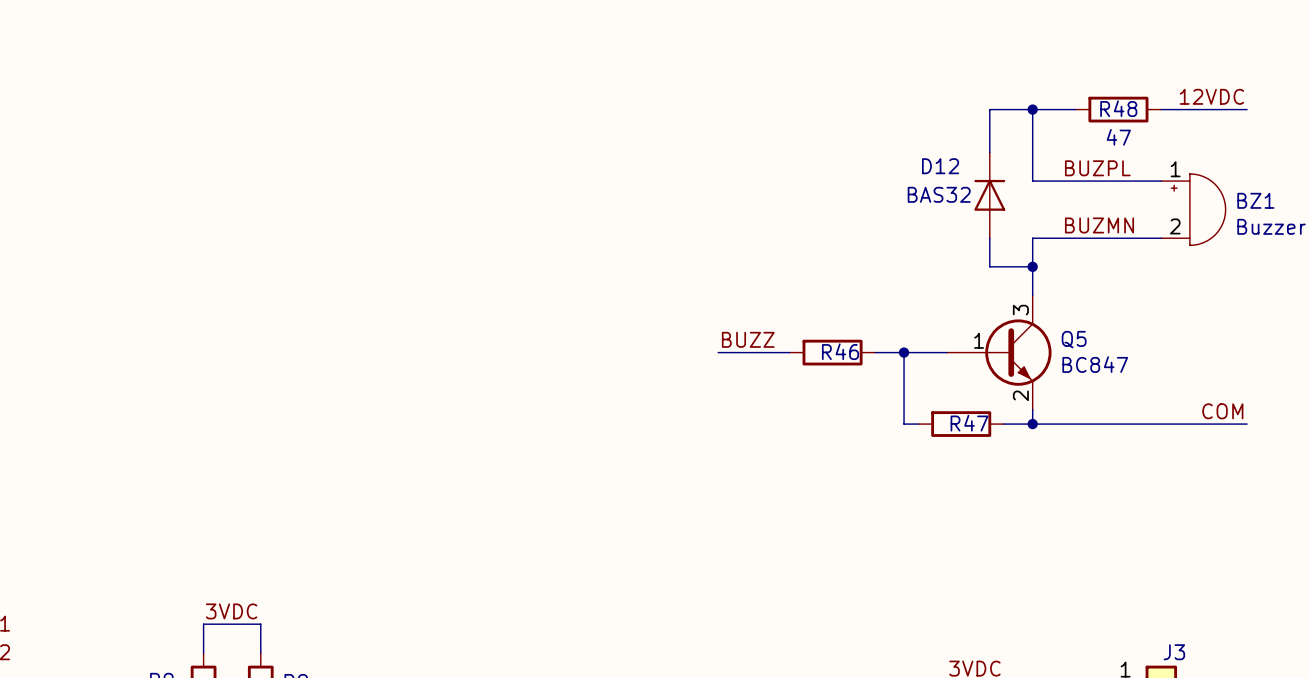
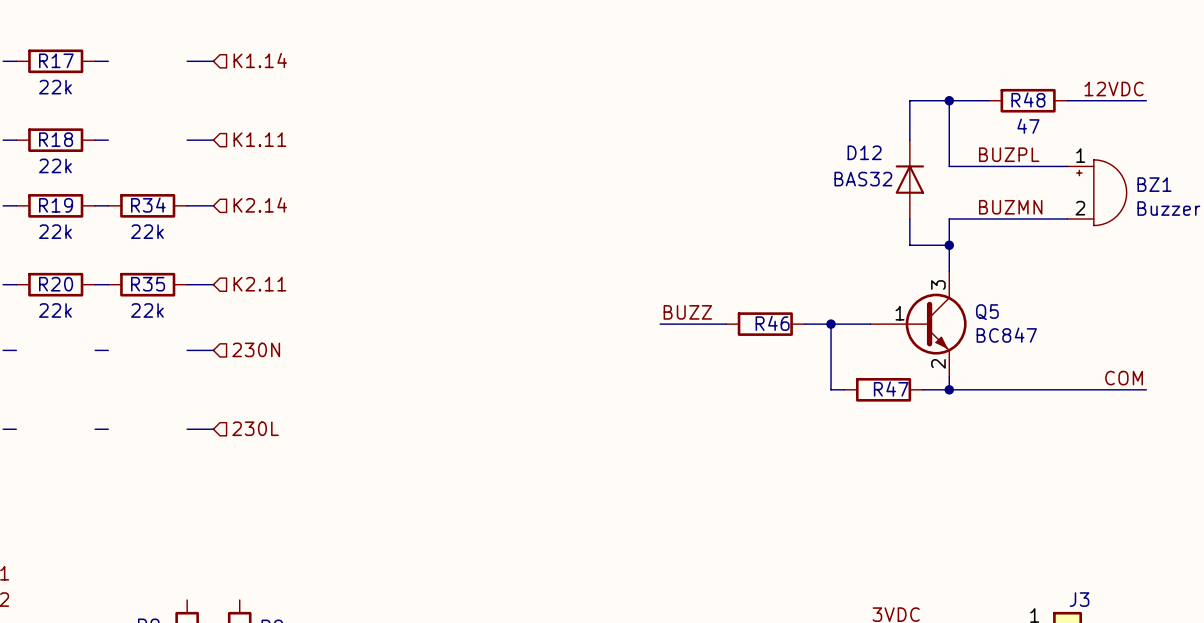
hierarchical label: none -> K1.14 (260, 60)
wire: none -> (3, 61) (16, 61)
R17: none -> 22k (55, 61)
wire: none -> (95, 61) (108, 61)
wire: none -> (187, 61) (213, 61)
hierarchical label: none -> K1.11 (259, 139)
wire: none -> (3, 140) (16, 140)
R18: none -> 22k (55, 140)
wire: none -> (95, 140) (108, 140)
wire: none -> (187, 140) (213, 140)
wire: none -> (3, 205) (16, 205)
R19: none -> 22k (55, 205)
wire: none -> (95, 205) (108, 205)
R34: none -> 22k (147, 205)
wire: none -> (187, 205) (213, 205)
hierarchical label: none -> K2.14 (260, 205)
wire: none -> (3, 284) (16, 284)
R20: none -> 22k (55, 284)
wire: none -> (95, 284) (108, 284)
R35: none -> 22k (147, 284)
wire: none -> (187, 284) (213, 284)
hierarchical label: none -> K2.11 (259, 284)
hierarchical label: none -> 230N (256, 349)
wire: none -> (3, 350) (16, 350)
wire: none -> (95, 350) (108, 350)
wire: none -> (187, 350) (213, 350)
wire: none -> (3, 429) (16, 429)
wire: none -> (95, 429) (108, 429)
wire: none -> (187, 429) (213, 429)
hierarchical label: none -> 230L (255, 428)
label: 3VDC (231, 611) -> none
wire: (203, 652) (203, 624) (260, 624) (260, 652) -> none

